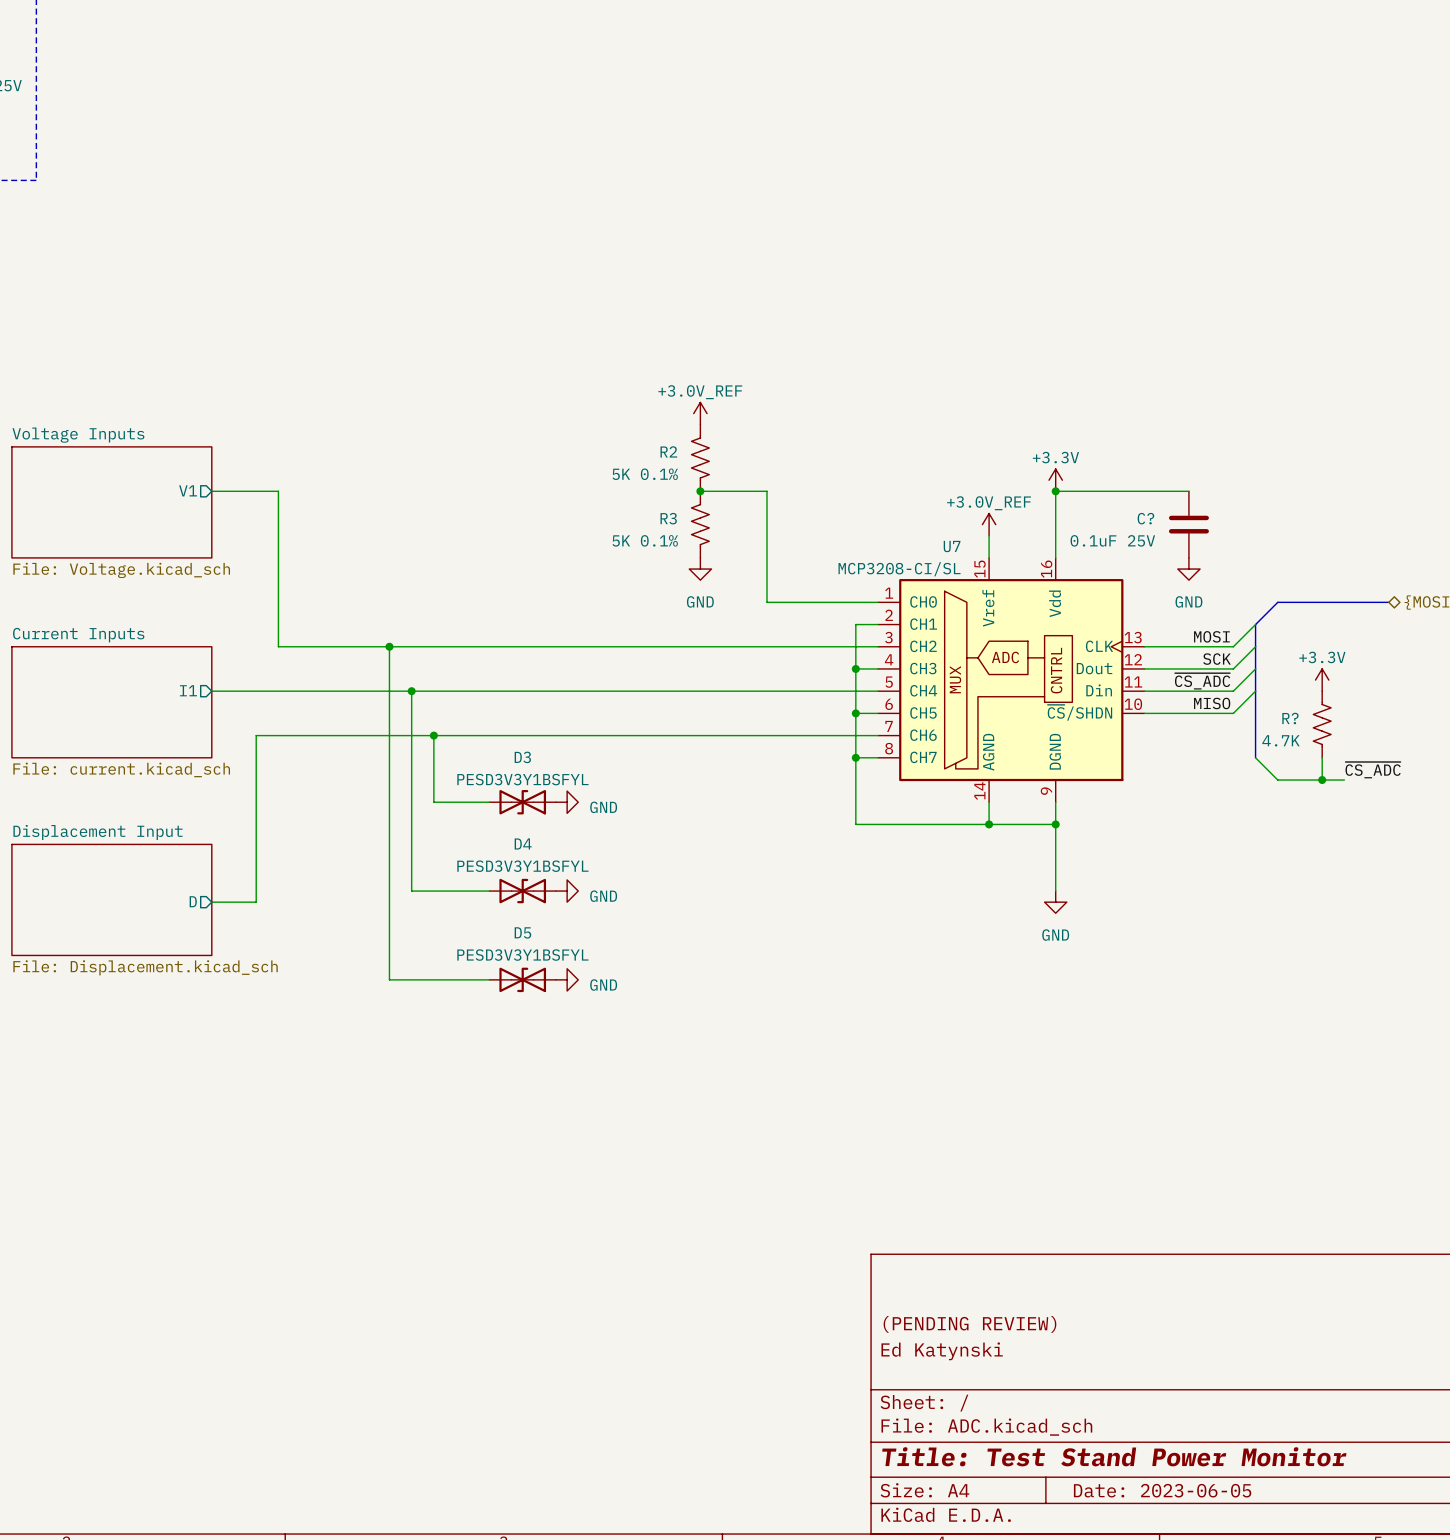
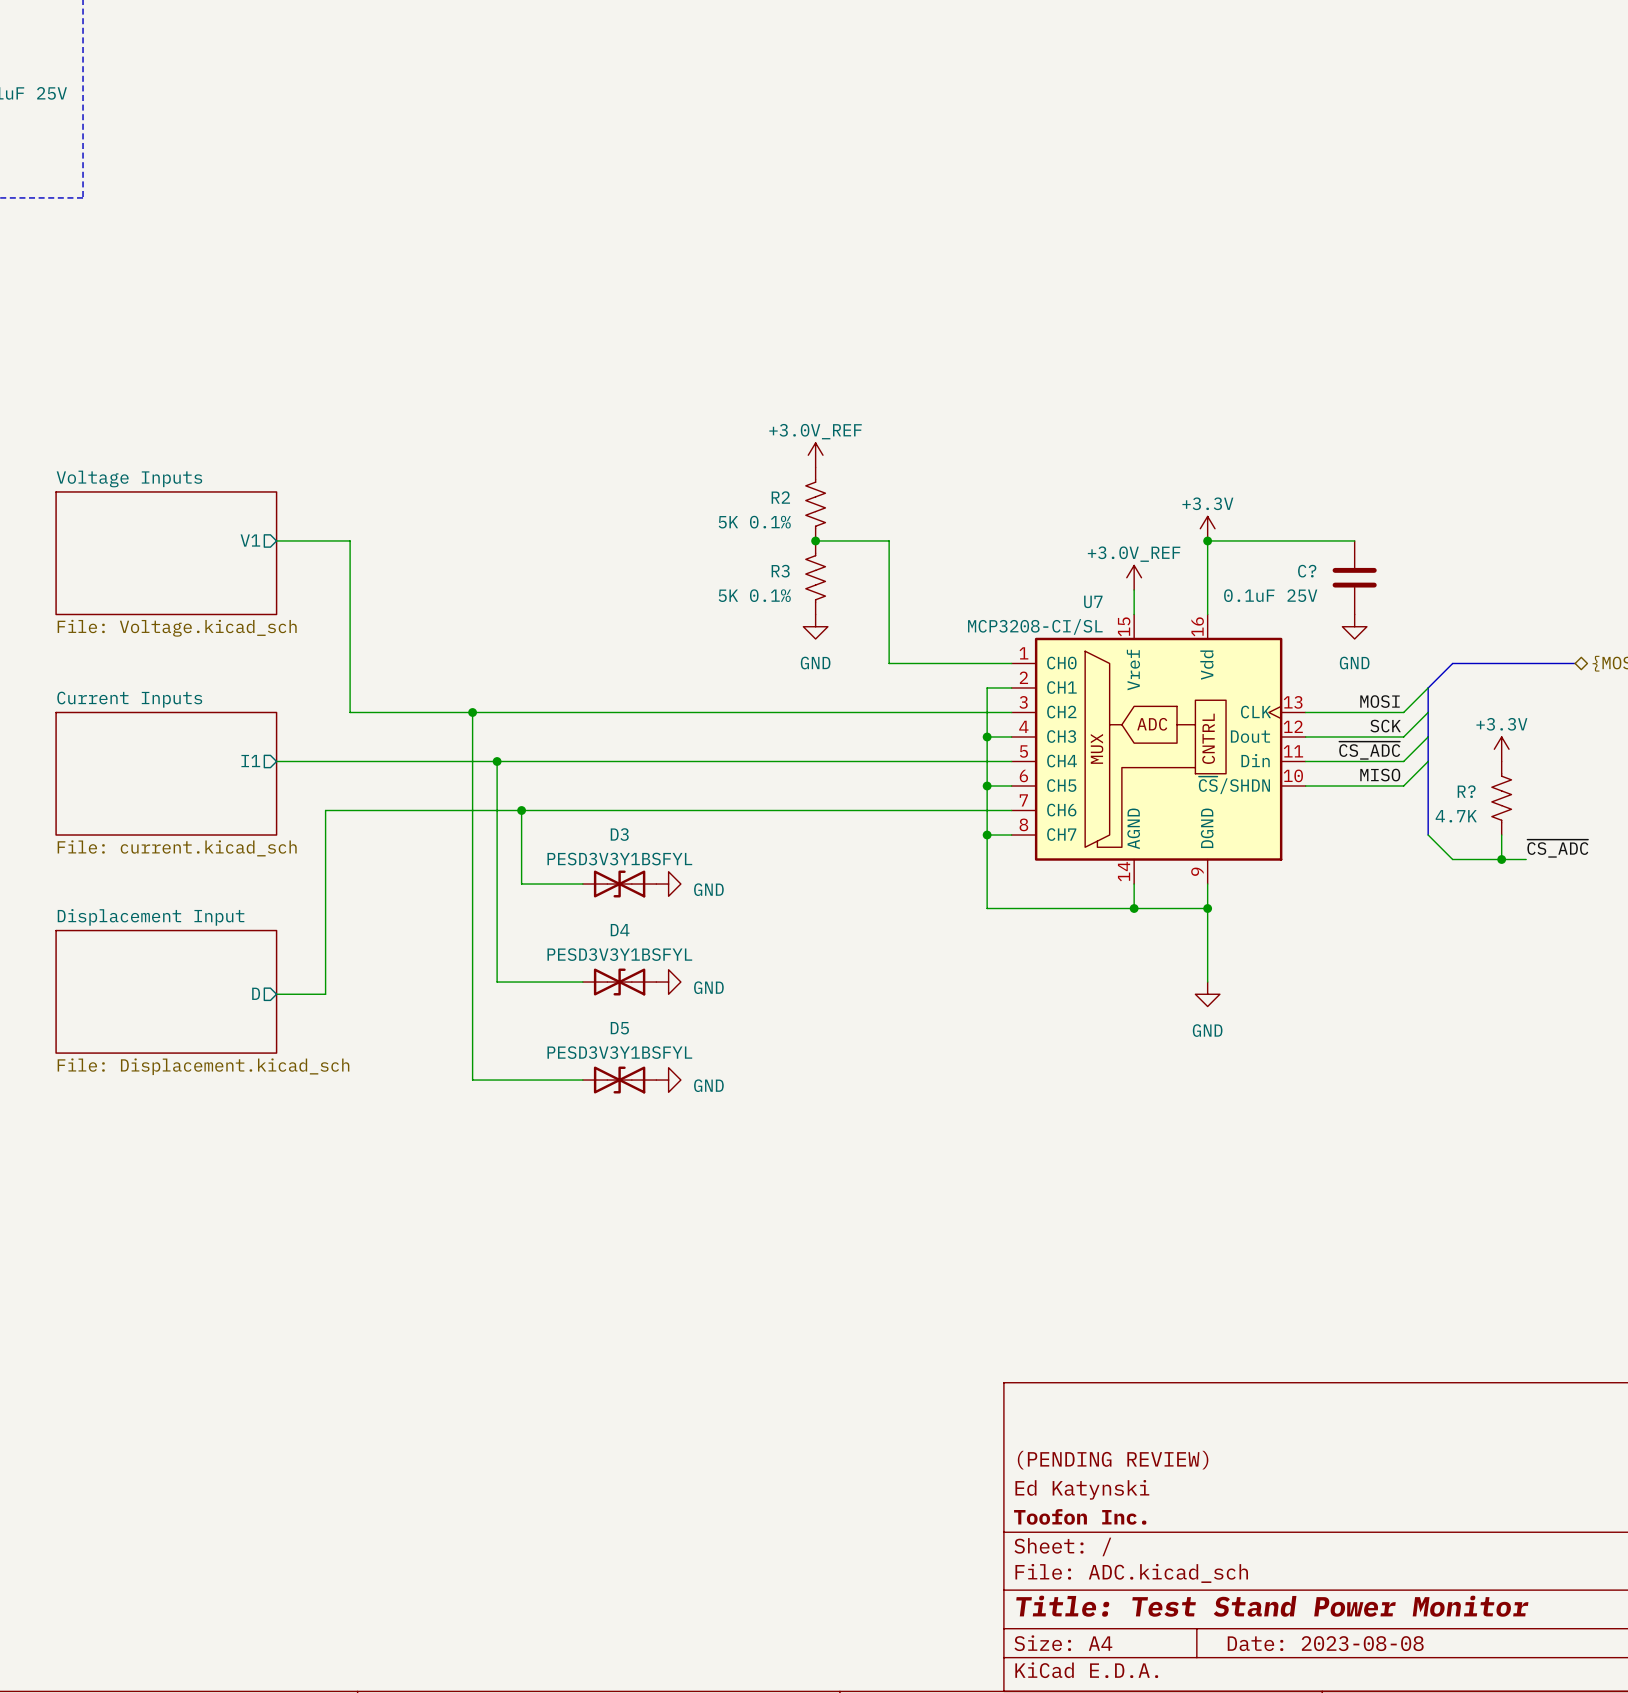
title block: none -> Toofon Inc. (1080, 1516)
title block: Date: 2023-06-05 (1162, 1490) -> Date: 2023-08-08 (1325, 1643)

